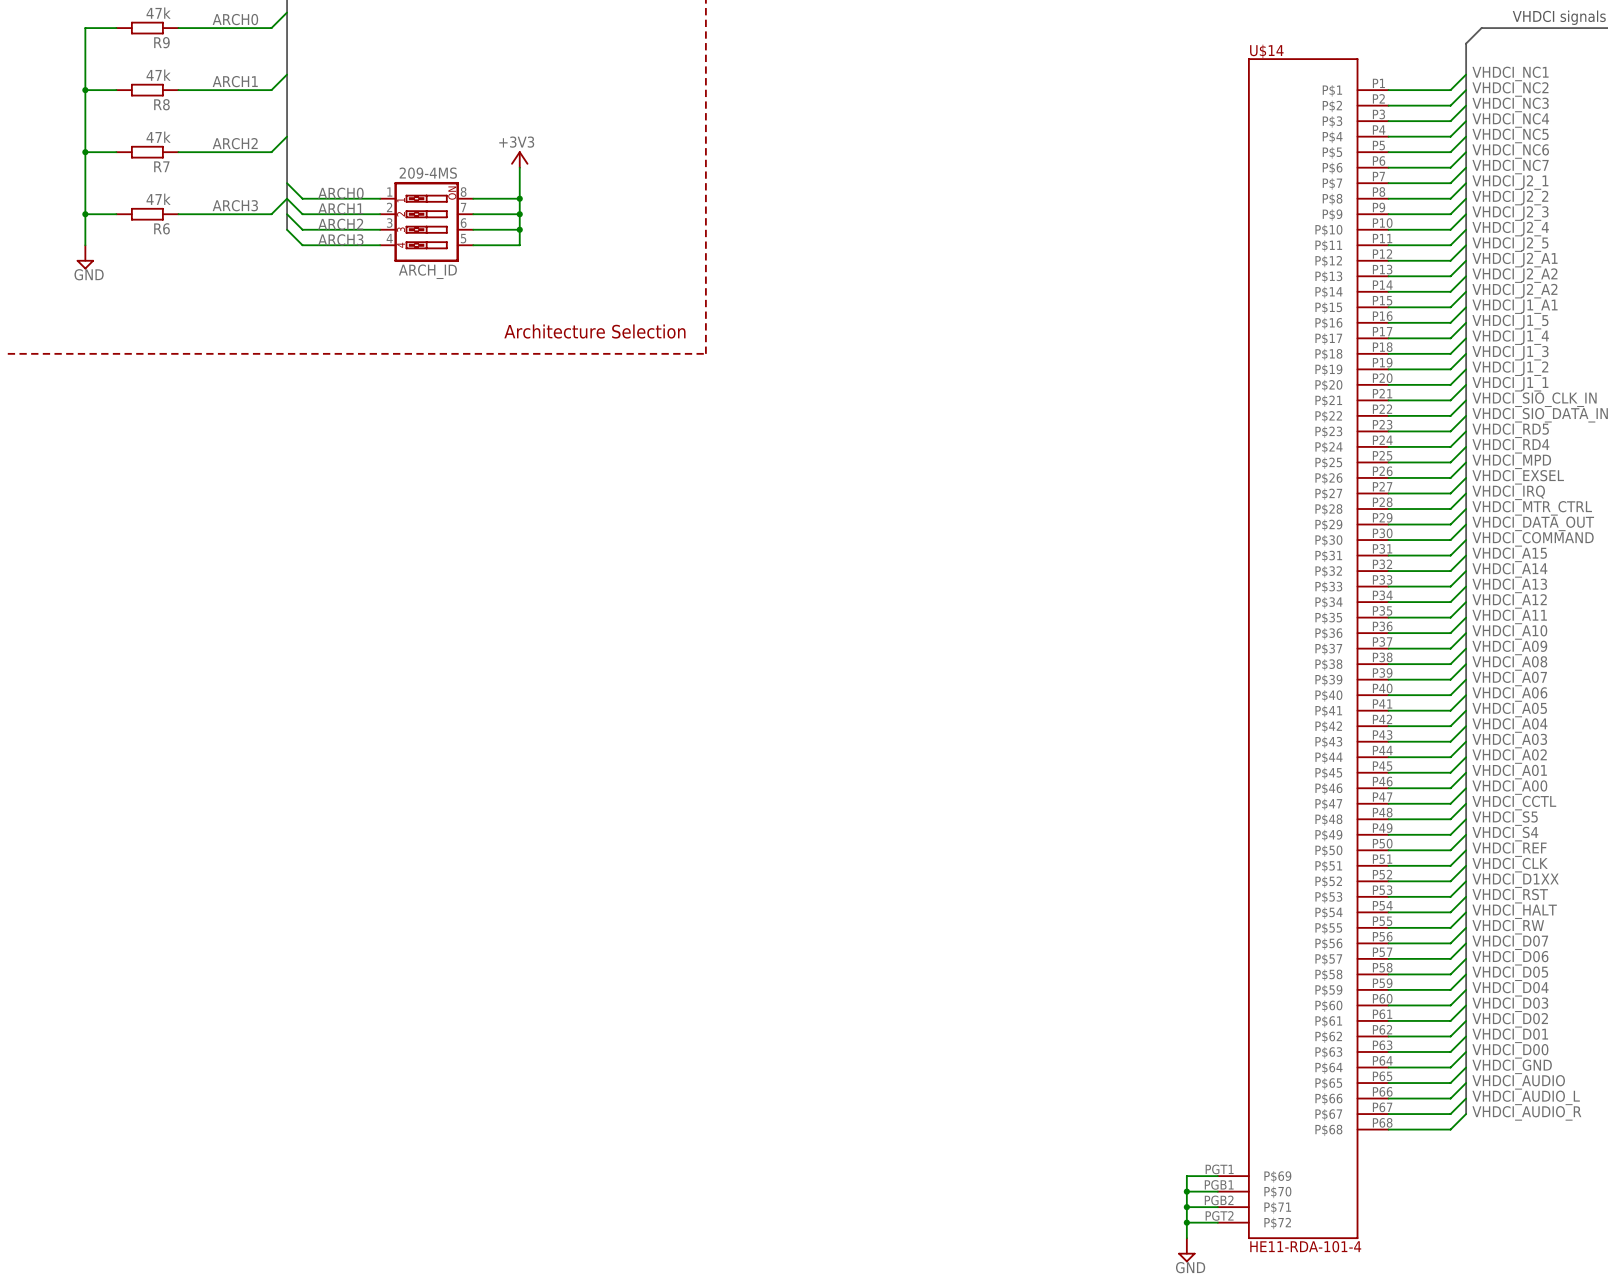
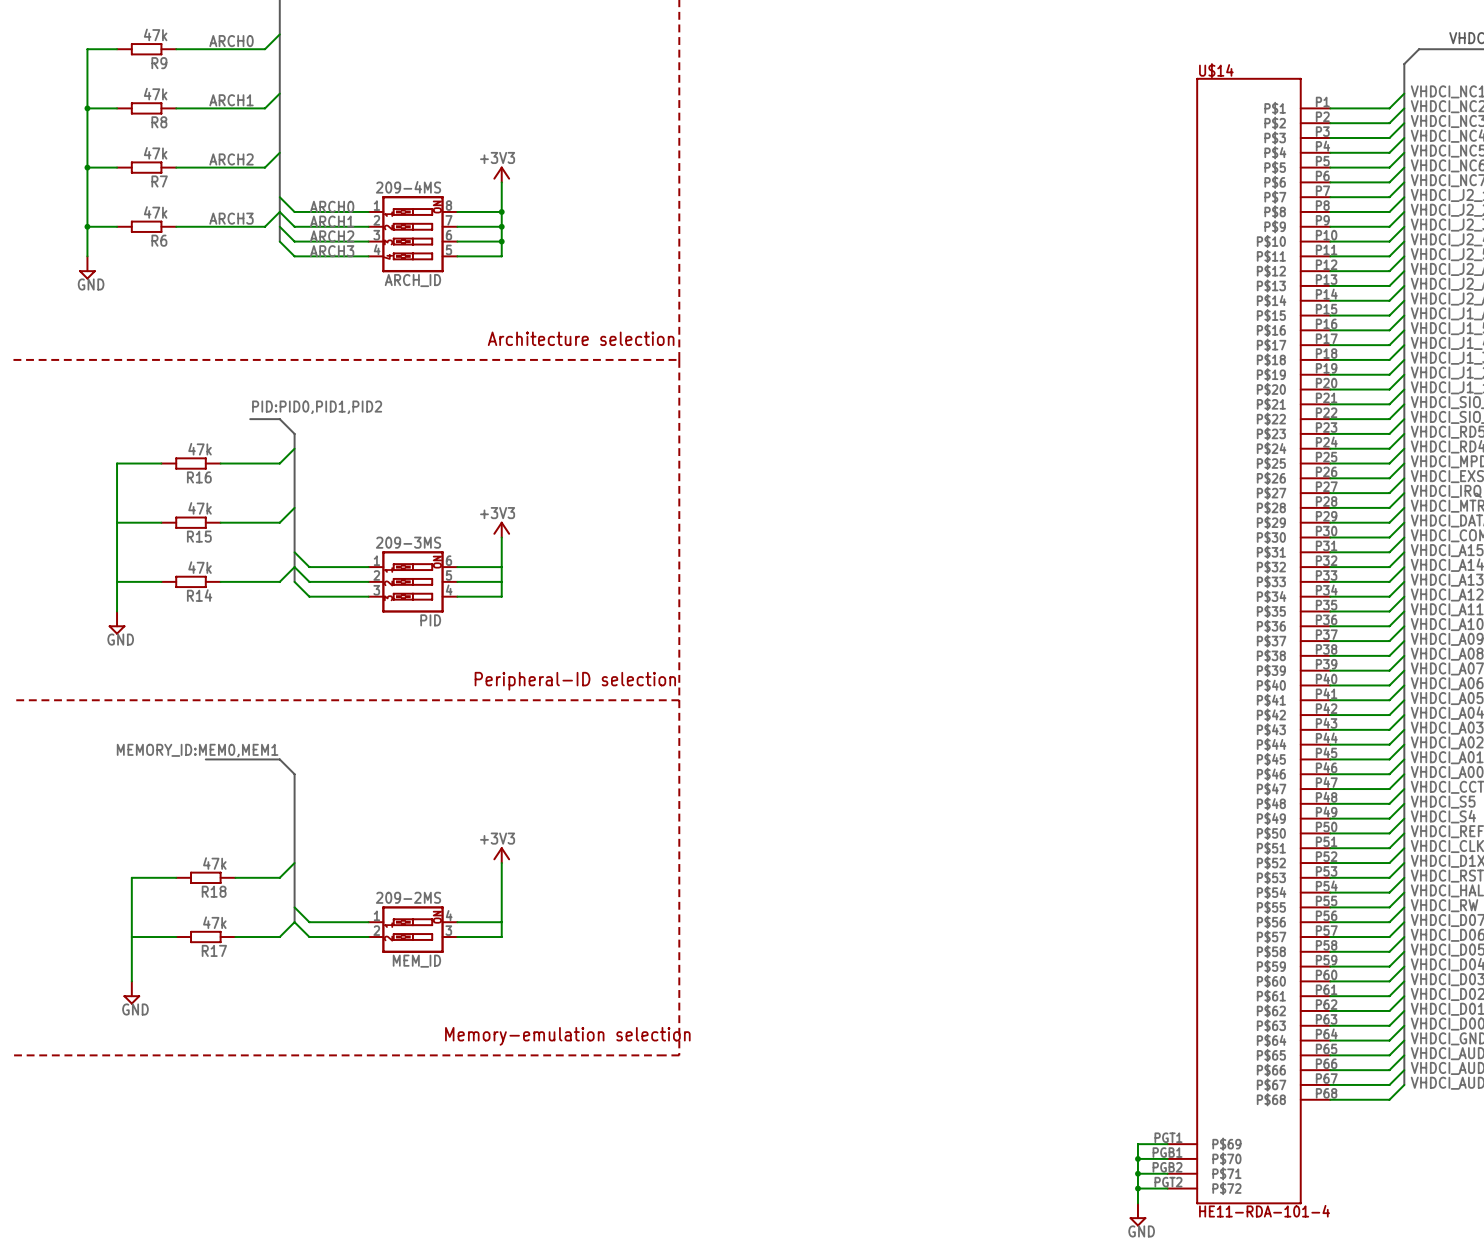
text: Architecture Selection (594, 331) -> Architecture selection (581, 338)
line: none -> (679, 359) (679, 1055) (13, 1055)
label: none -> PID:PID0,PID1,PID2 (317, 407)
bus: none -> (250, 419) (279, 419) (294, 433) (294, 581)
wire: none -> (294, 448) (279, 463) (220, 463)
wire: none -> (161, 463) (117, 463) (117, 611)
R16: none -> 47k (191, 463)
wire: none -> (294, 507) (279, 522) (220, 522)
wire: none -> (117, 522) (161, 522)
R15: none -> 47k (191, 522)
power symbol: none -> +3V3 (501, 529)
wire: none -> (501, 537) (501, 596) (457, 596)
wire: none -> (294, 552) (309, 567) (368, 567)
wire: none -> (457, 567) (501, 567)
wire: none -> (117, 581) (161, 581)
R14: none -> 47k (191, 581)
wire: none -> (220, 581) (279, 581) (294, 567) (309, 581) (368, 581)
wire: none -> (294, 581) (309, 596) (368, 596)
PID: none -> 209-3MS (412, 581)
wire: none -> (457, 581) (501, 581)
power symbol: none -> GND (117, 622)
text: none -> Peripheral-ID selection (575, 681)
line: none -> (13, 700) (679, 700)
label: none -> MEMORY_ID:MEM0,MEM1 (197, 750)
bus: none -> (205, 759) (279, 759) (294, 774) (294, 922)
power symbol: none -> +3V3 (501, 855)
wire: none -> (294, 863) (279, 877) (235, 877)
wire: none -> (501, 863) (501, 937) (457, 937)
wire: none -> (176, 877) (131, 877) (131, 981)
R18: none -> 47k (205, 877)
wire: none -> (294, 907) (309, 922) (368, 922)
wire: none -> (457, 922) (501, 922)
MEM_ID: none -> 209-2MS (412, 929)
wire: none -> (131, 937) (176, 937)
R17: none -> 47k (205, 937)
wire: none -> (235, 937) (279, 937) (294, 922) (309, 937) (368, 937)
power symbol: none -> GND (131, 992)
text: none -> Memory-emulation selection (567, 1036)

